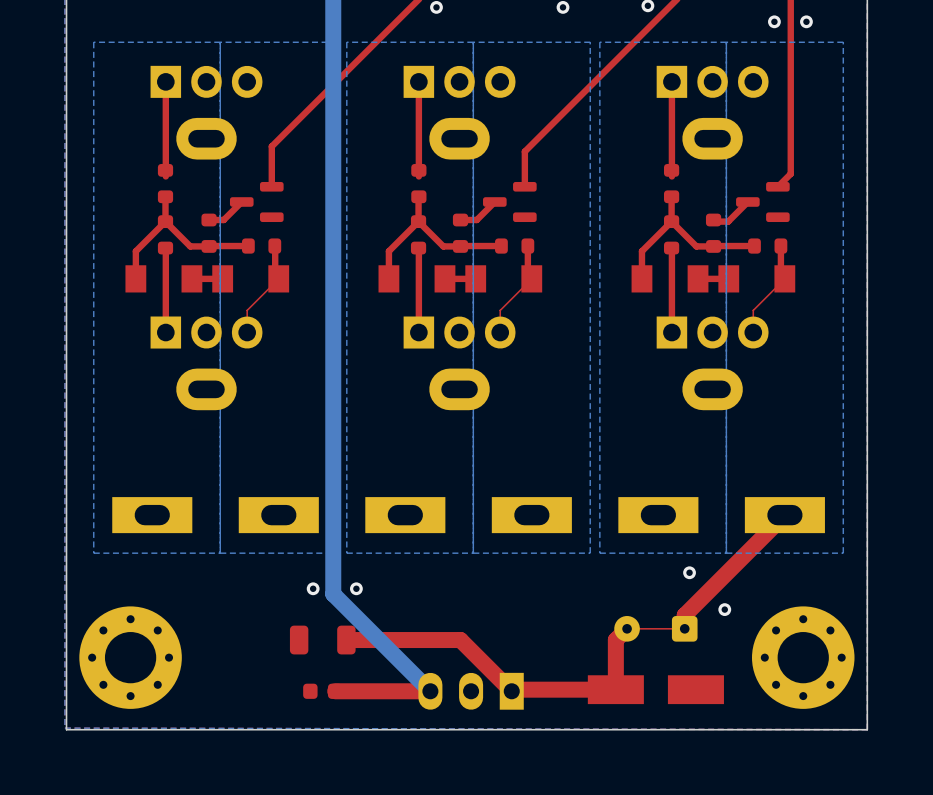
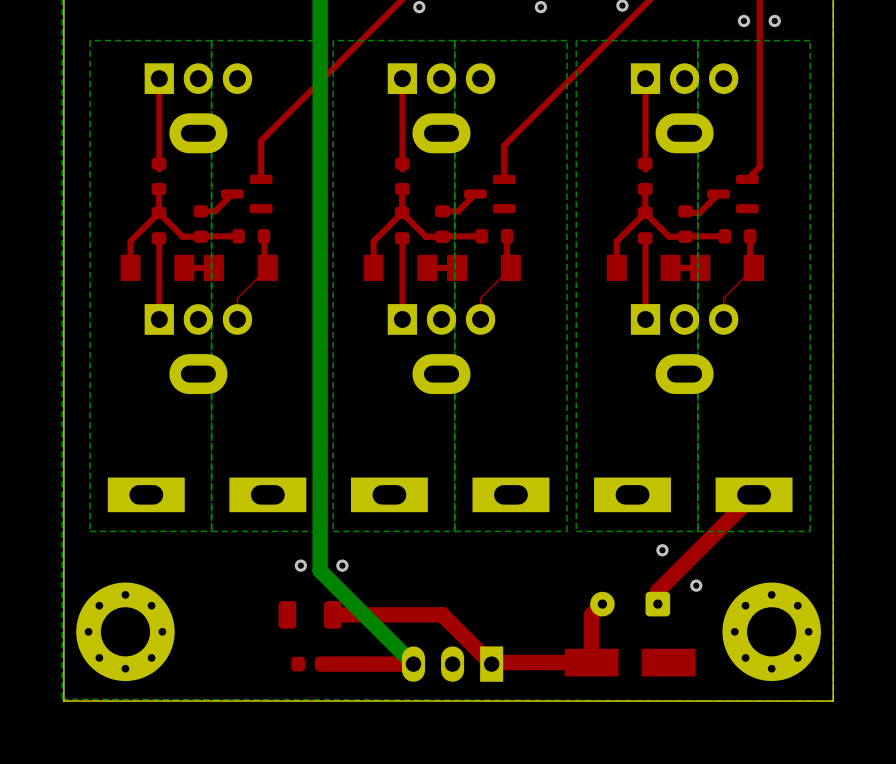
part footprint: [614, 616, 698, 642] -> [590, 591, 671, 617]

